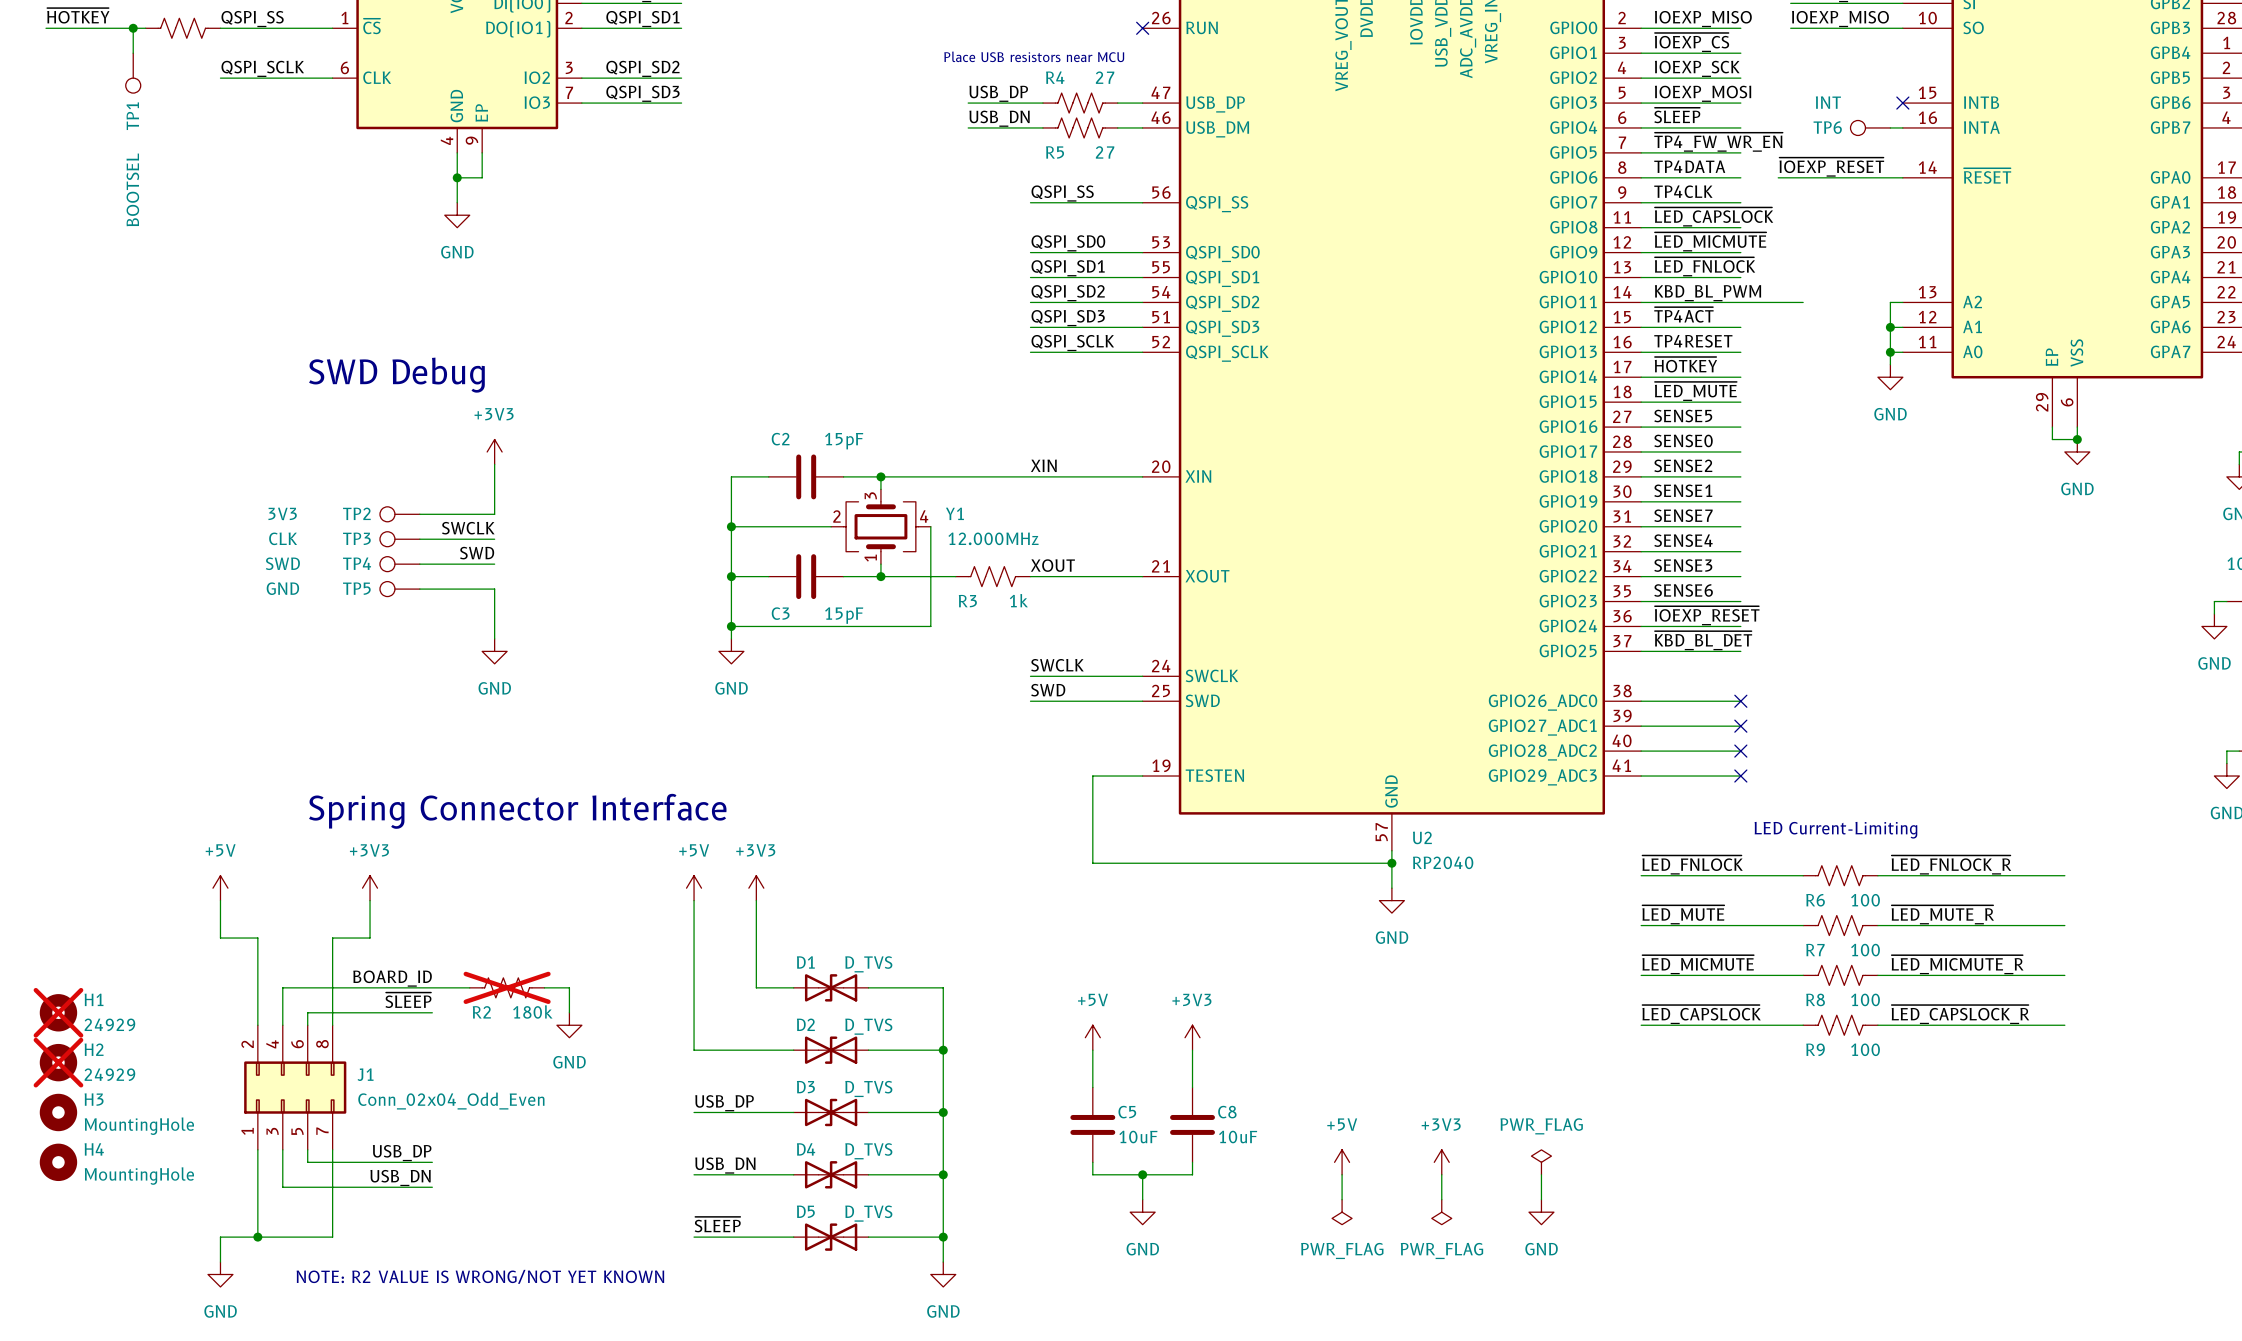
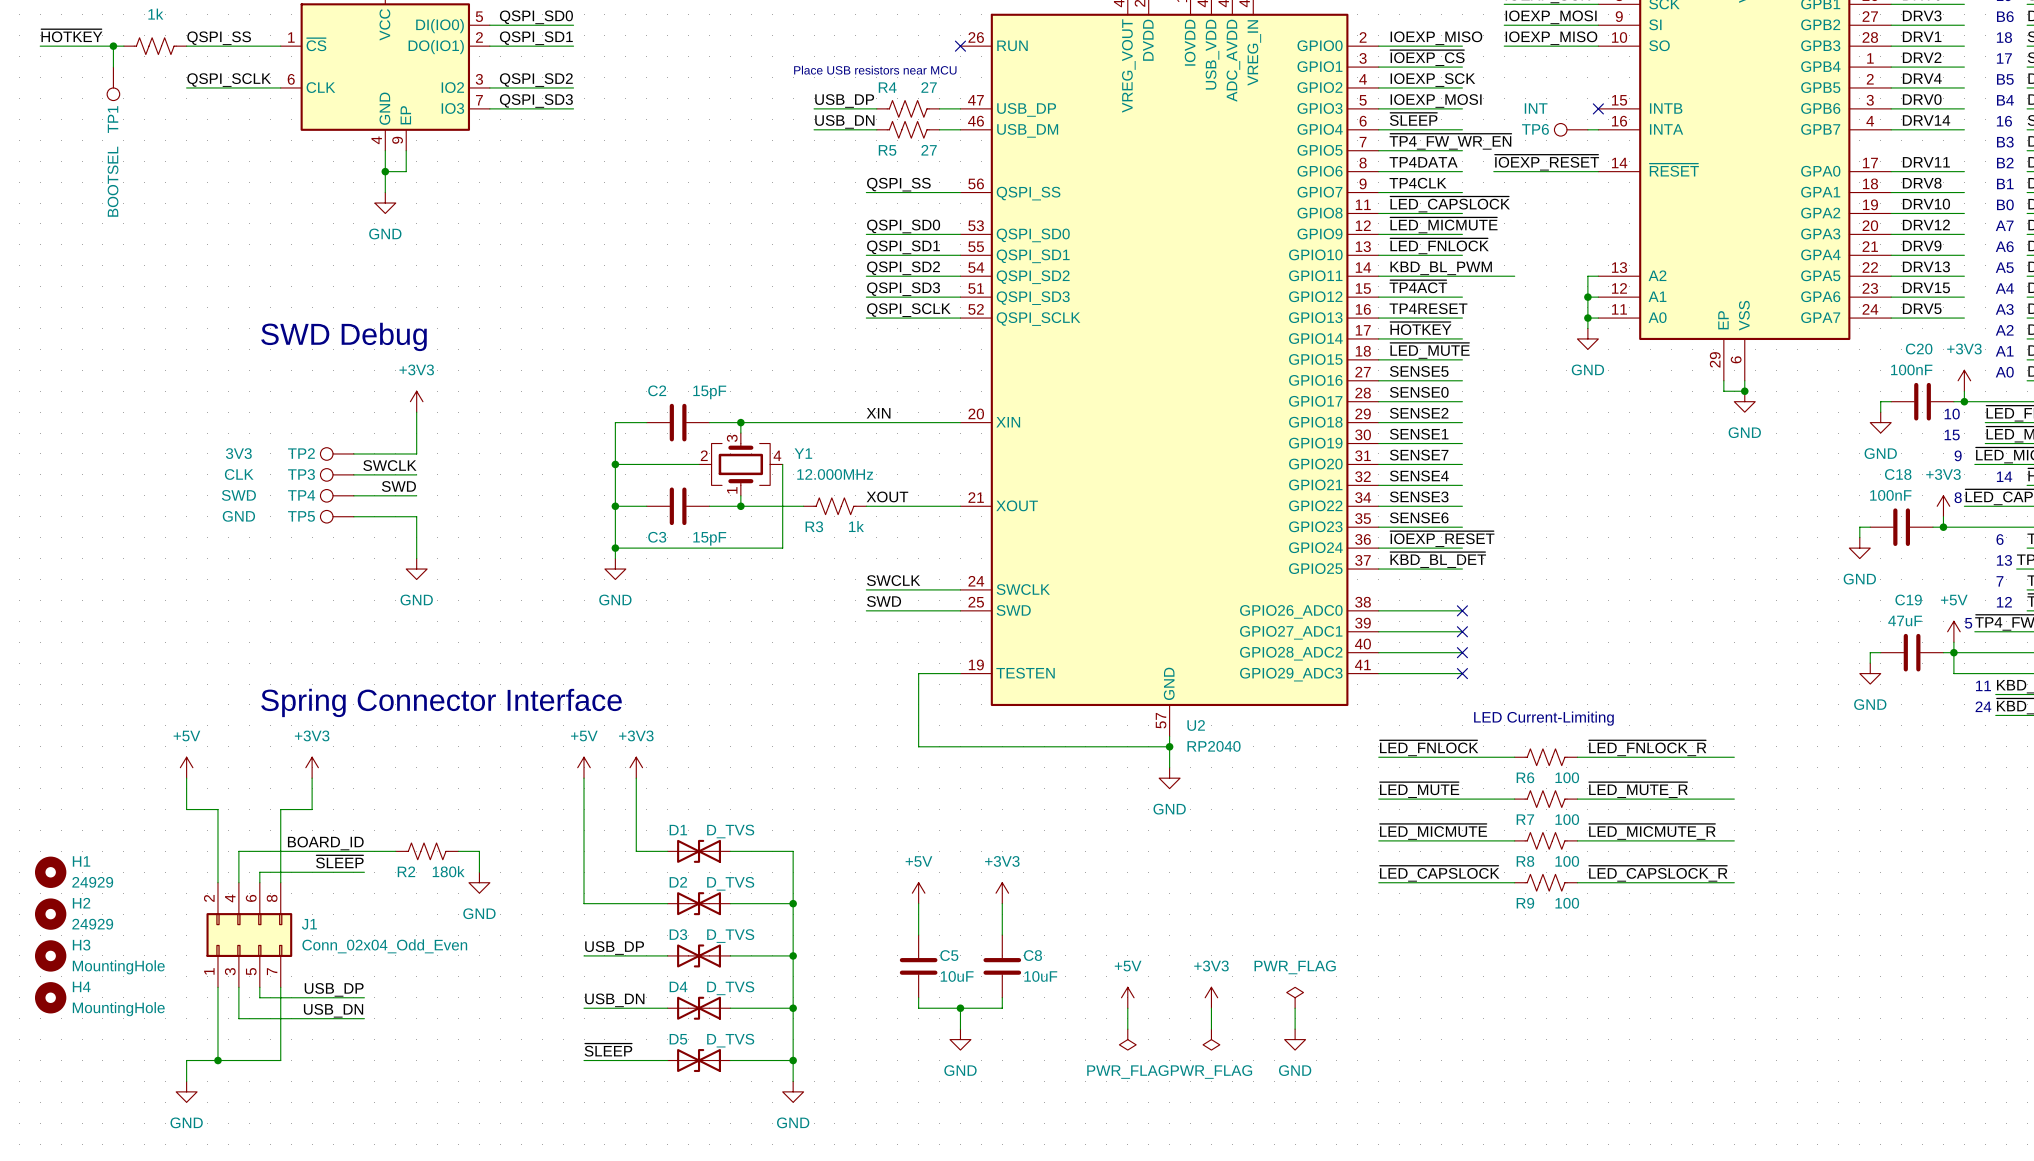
R2 do-not-place cross: (507, 987) -> none
H1 do-not-place cross: (58, 1012) -> none
H2 do-not-place cross: (58, 1062) -> none
text: NOTE: R2 VALUE IS WRONG/NOT YET KNOWN (480, 1276) -> none

